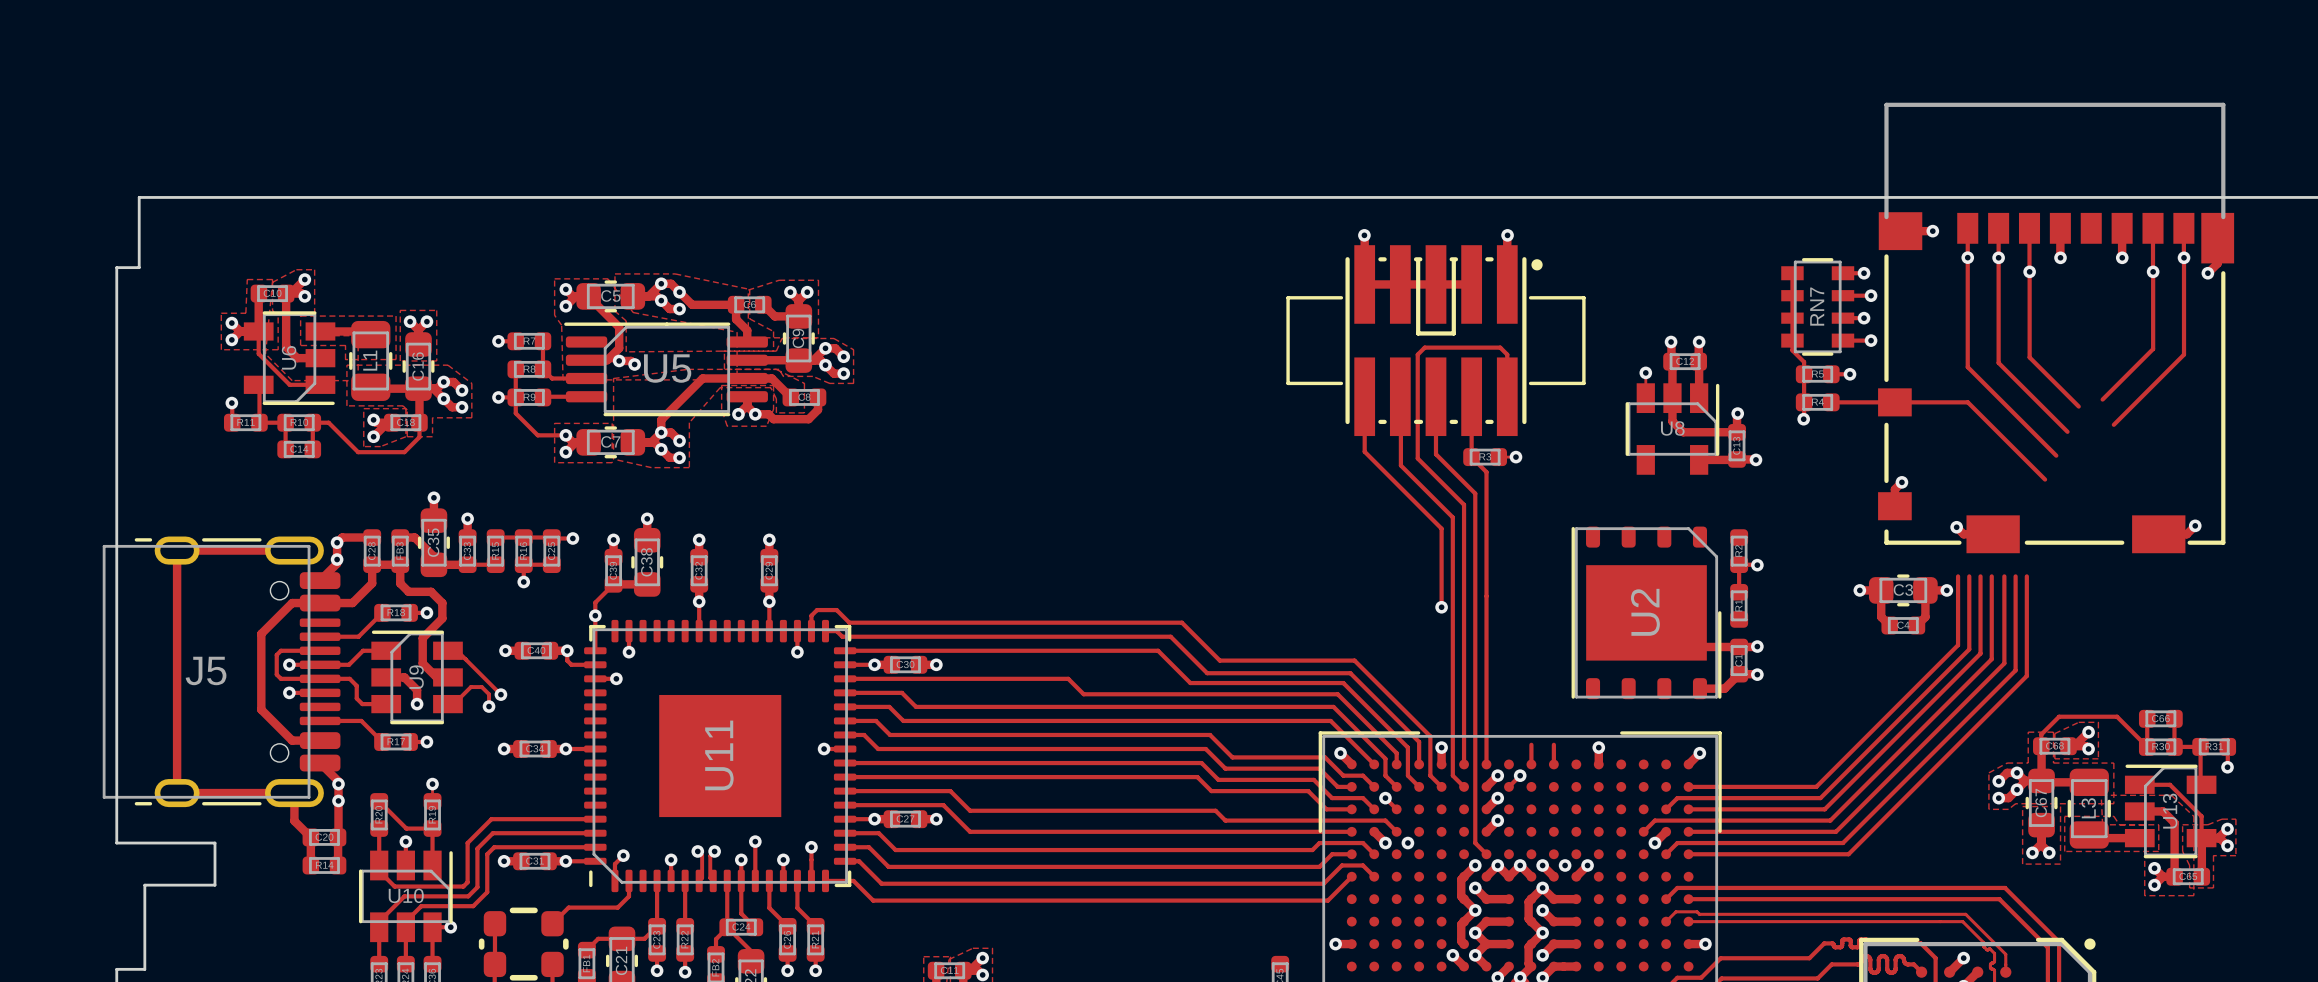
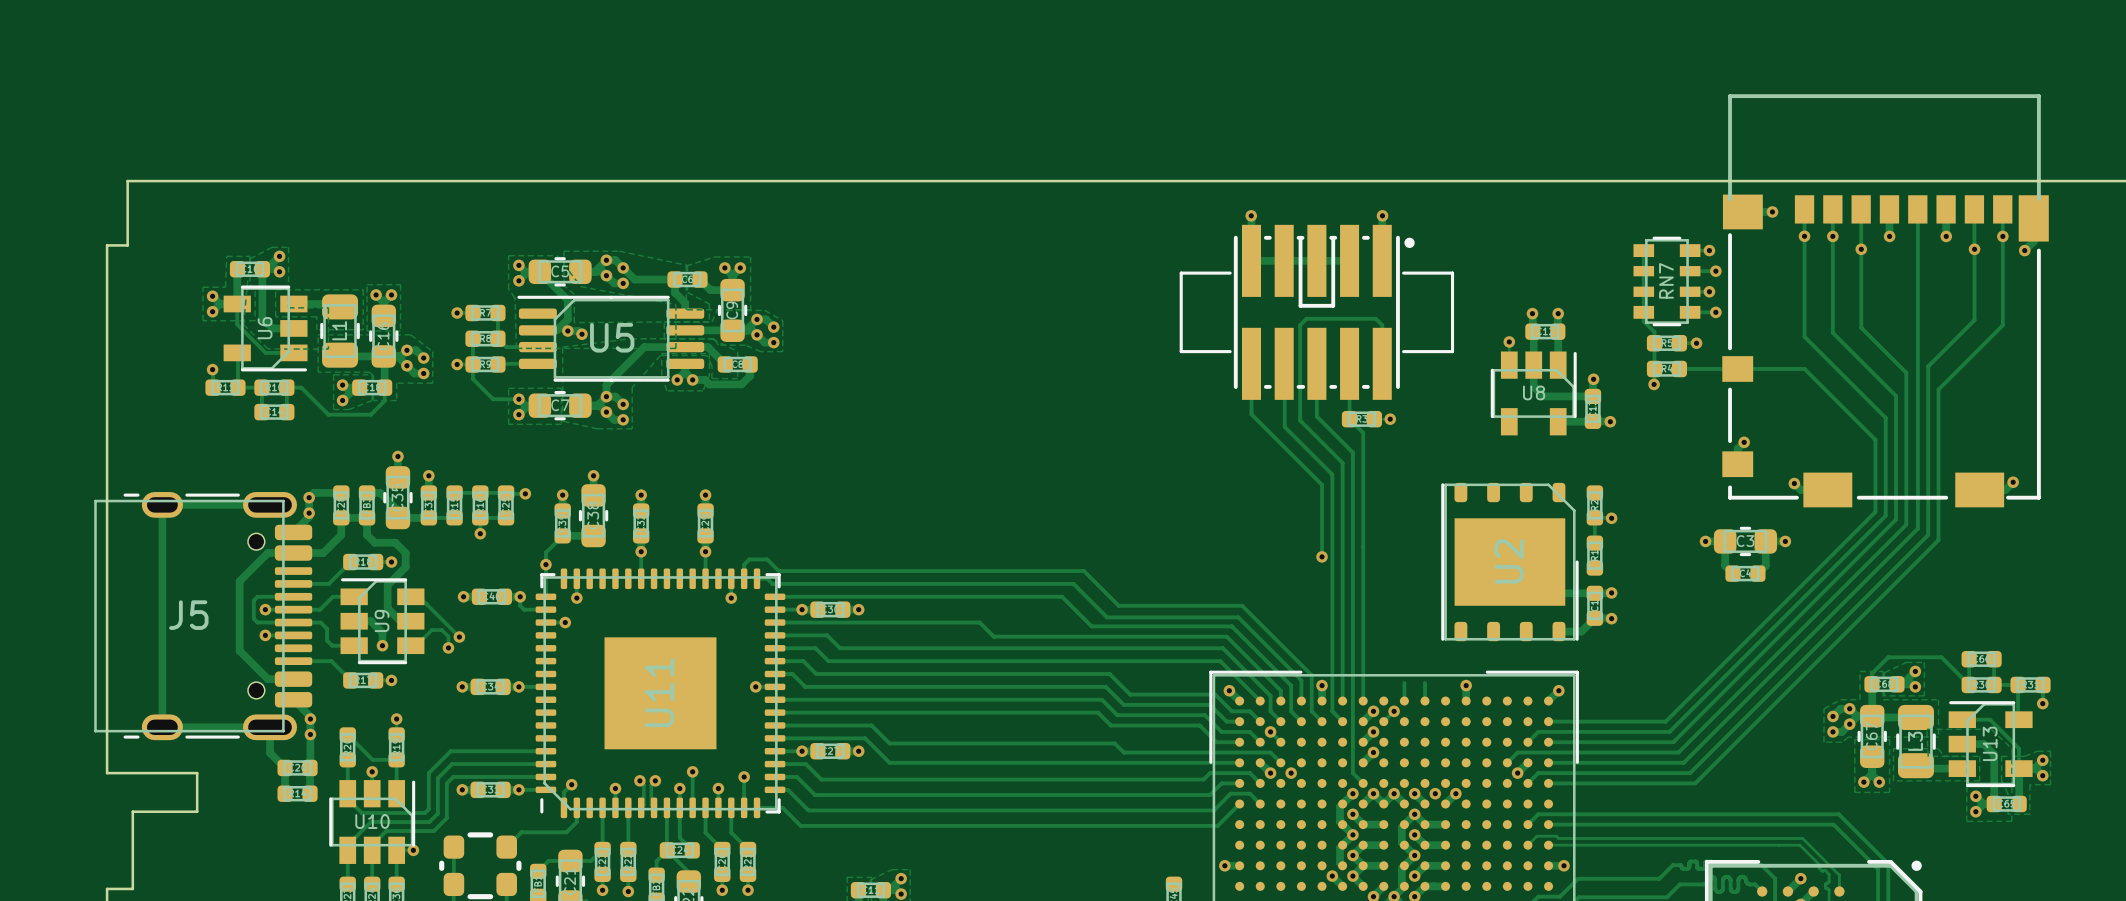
track: (1958, 576) (1958, 645) -> (1875, 439) (1875, 511) (1795, 591)
track: (1969, 576) (1969, 649) -> (1885, 417) (1885, 515) (1805, 595)
track: (1980, 576) (1980, 653) -> (1896, 396) (1896, 519) (1816, 599)
track: (1991, 576) (1991, 659) -> (1906, 372) (1906, 524) (1826, 604)
track: (2004, 576) (2004, 663) -> (1917, 209) (1917, 528) (1838, 608)
track: (2015, 576) (2015, 670) -> (1928, 366) (1928, 535) (1848, 614)
track: (2026, 576) (2026, 676) -> (1938, 389) (1938, 540) (1858, 619)

